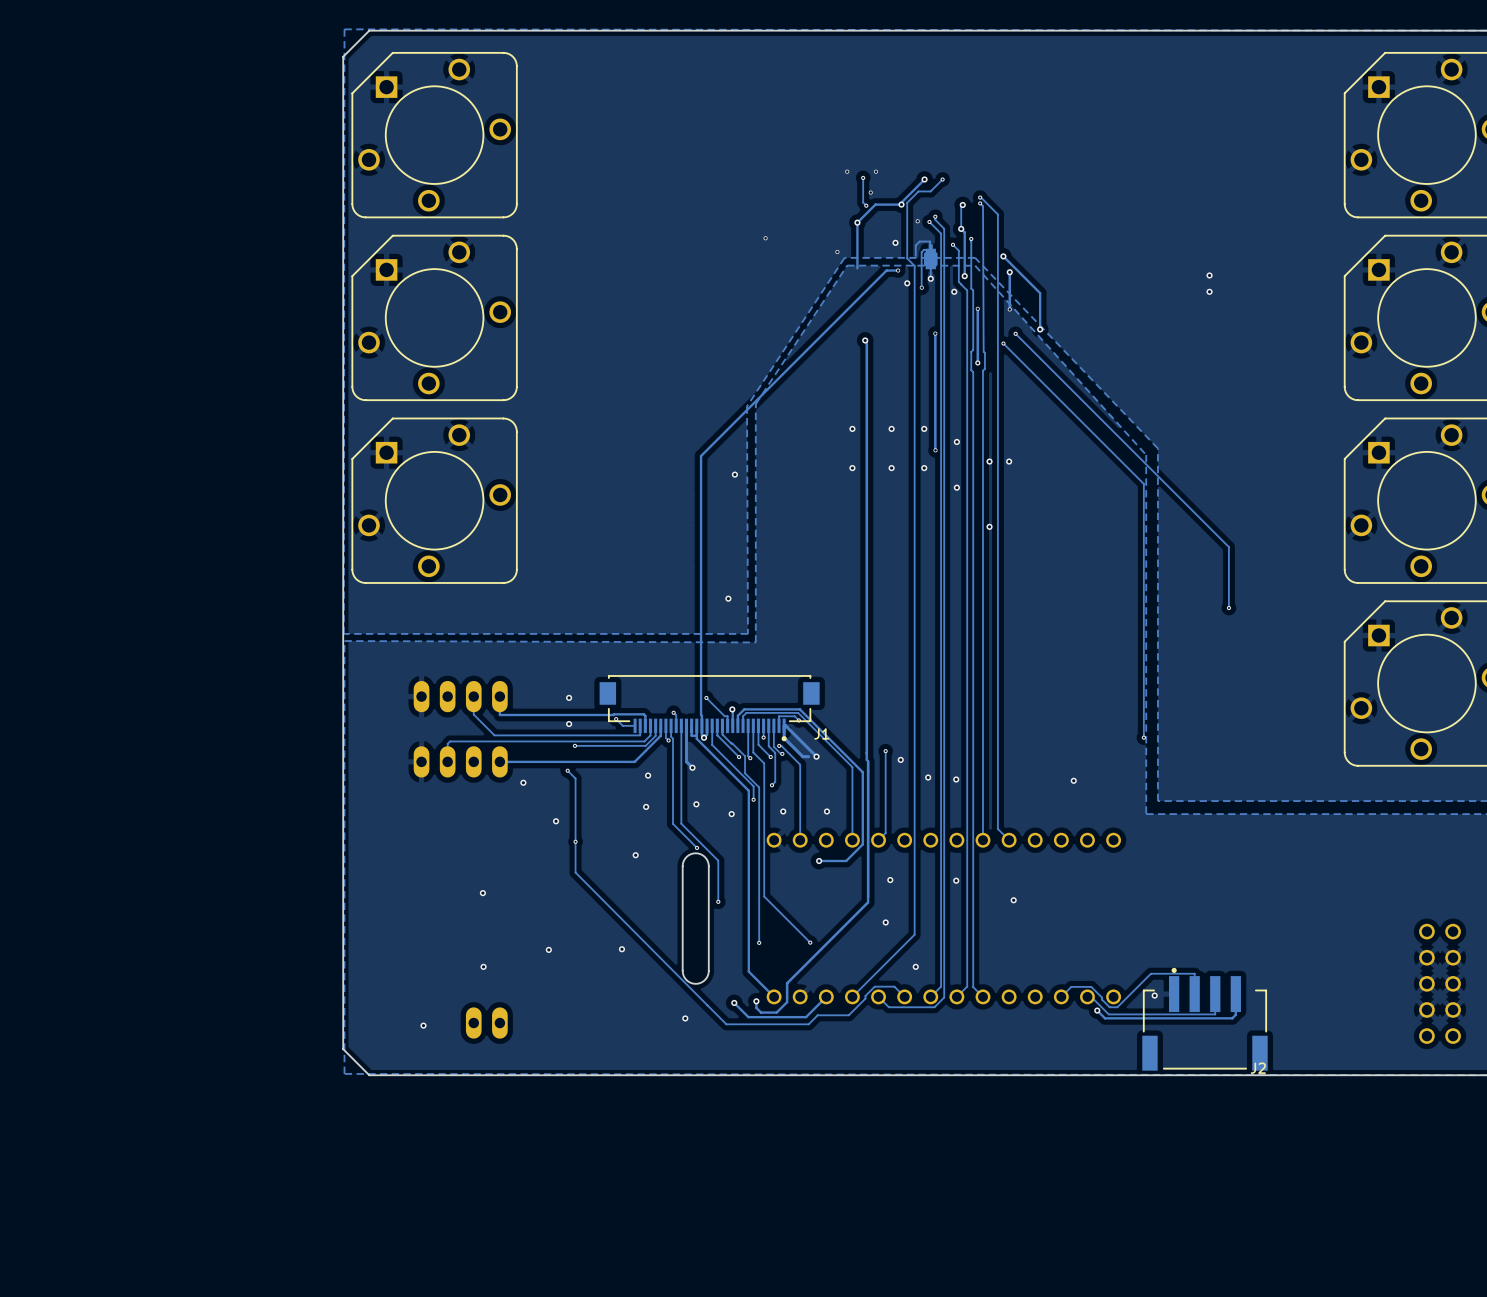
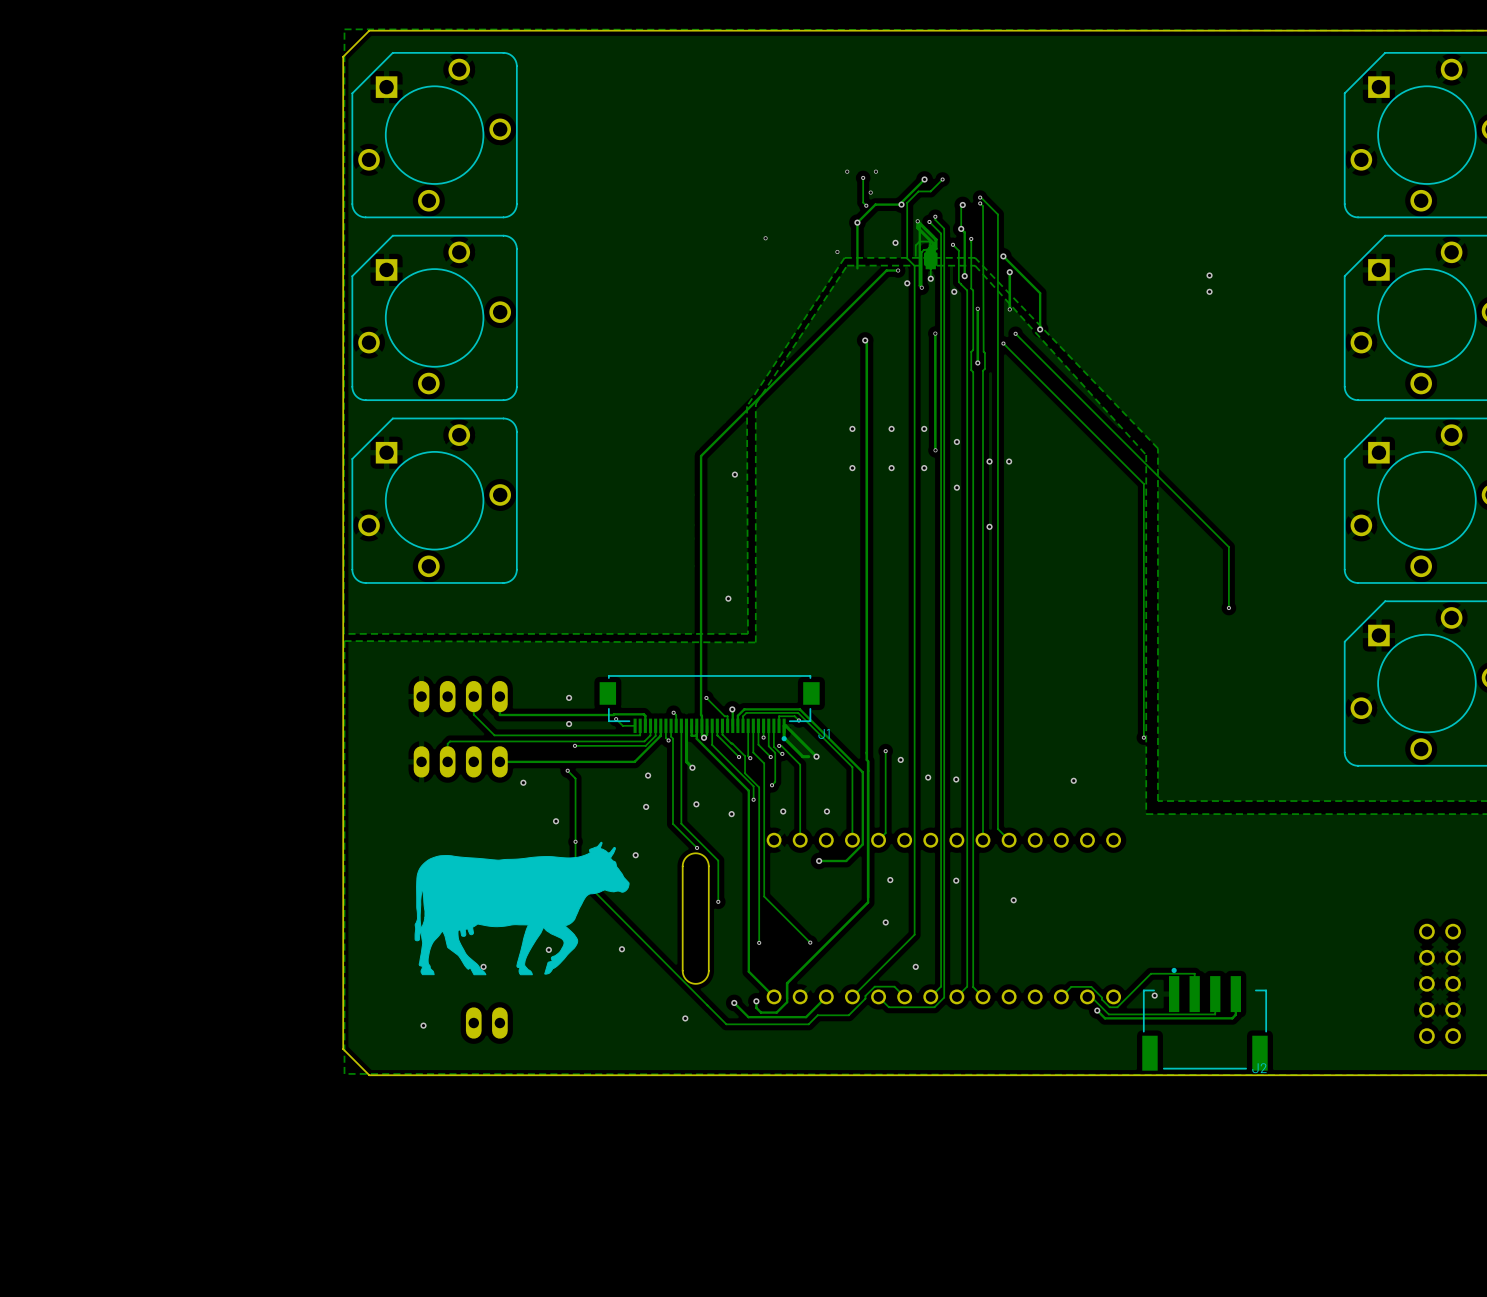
track: none -> (917, 221) (919, 223) (919, 285) (921, 287)
track: none -> (917, 221) (917, 227) (933, 243) (933, 246)
track: none -> (917, 221) (936, 239) (936, 248) (928, 249)
drawing: none -> [414, 841, 630, 976]

